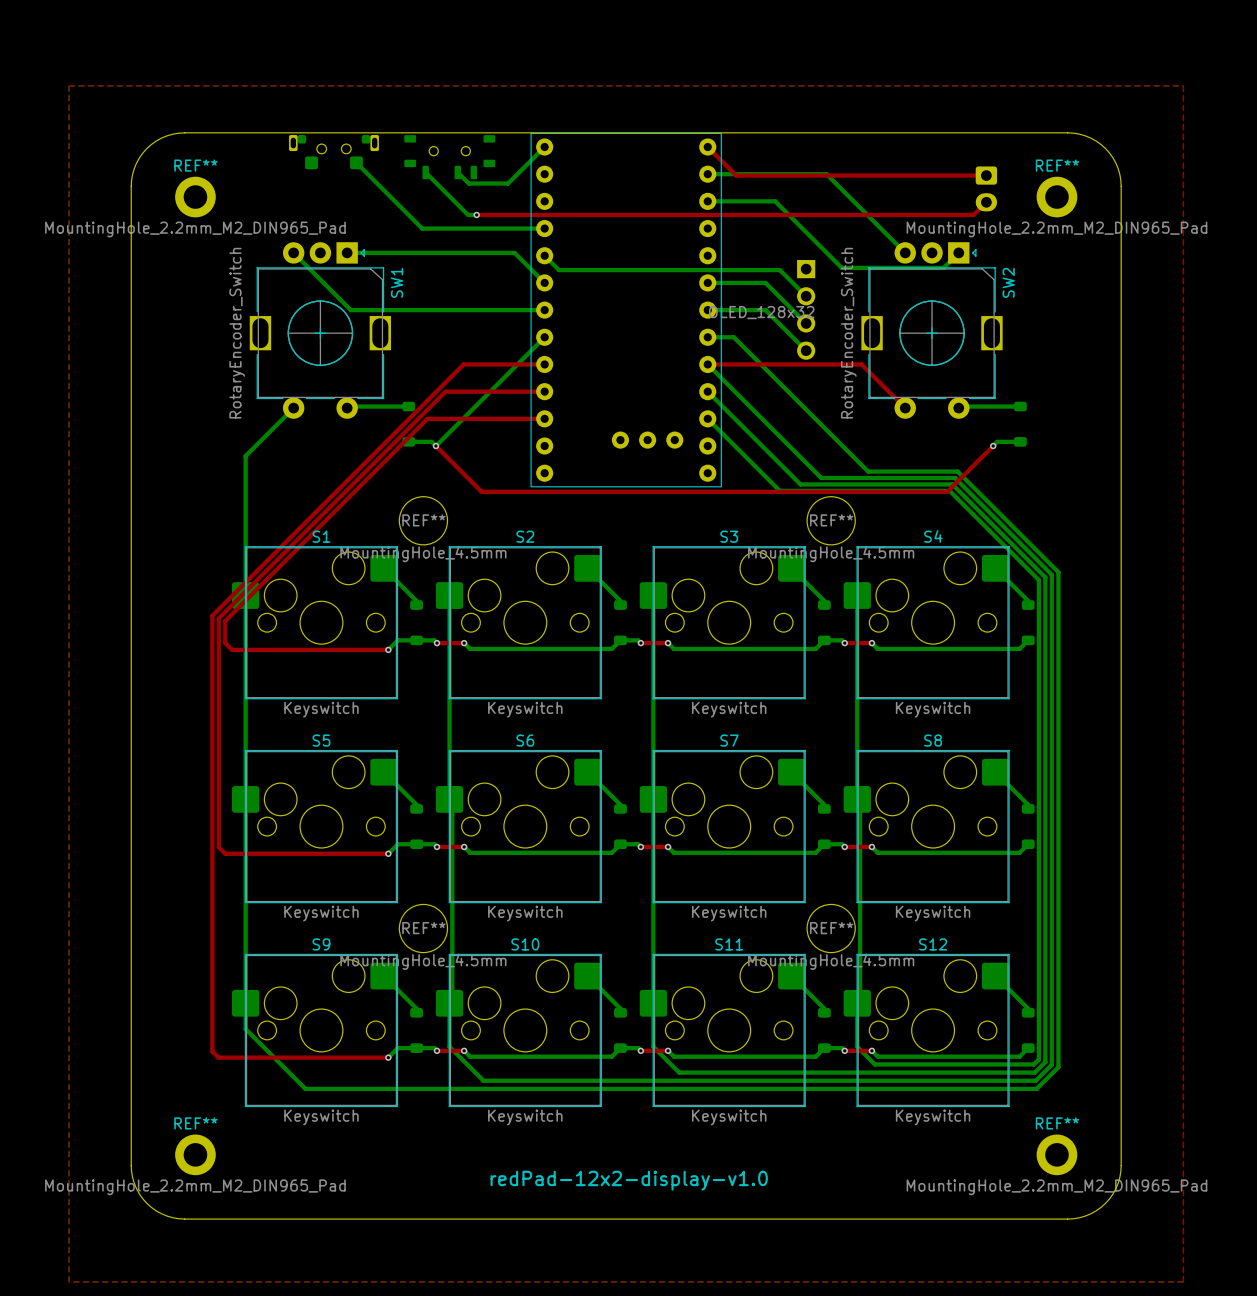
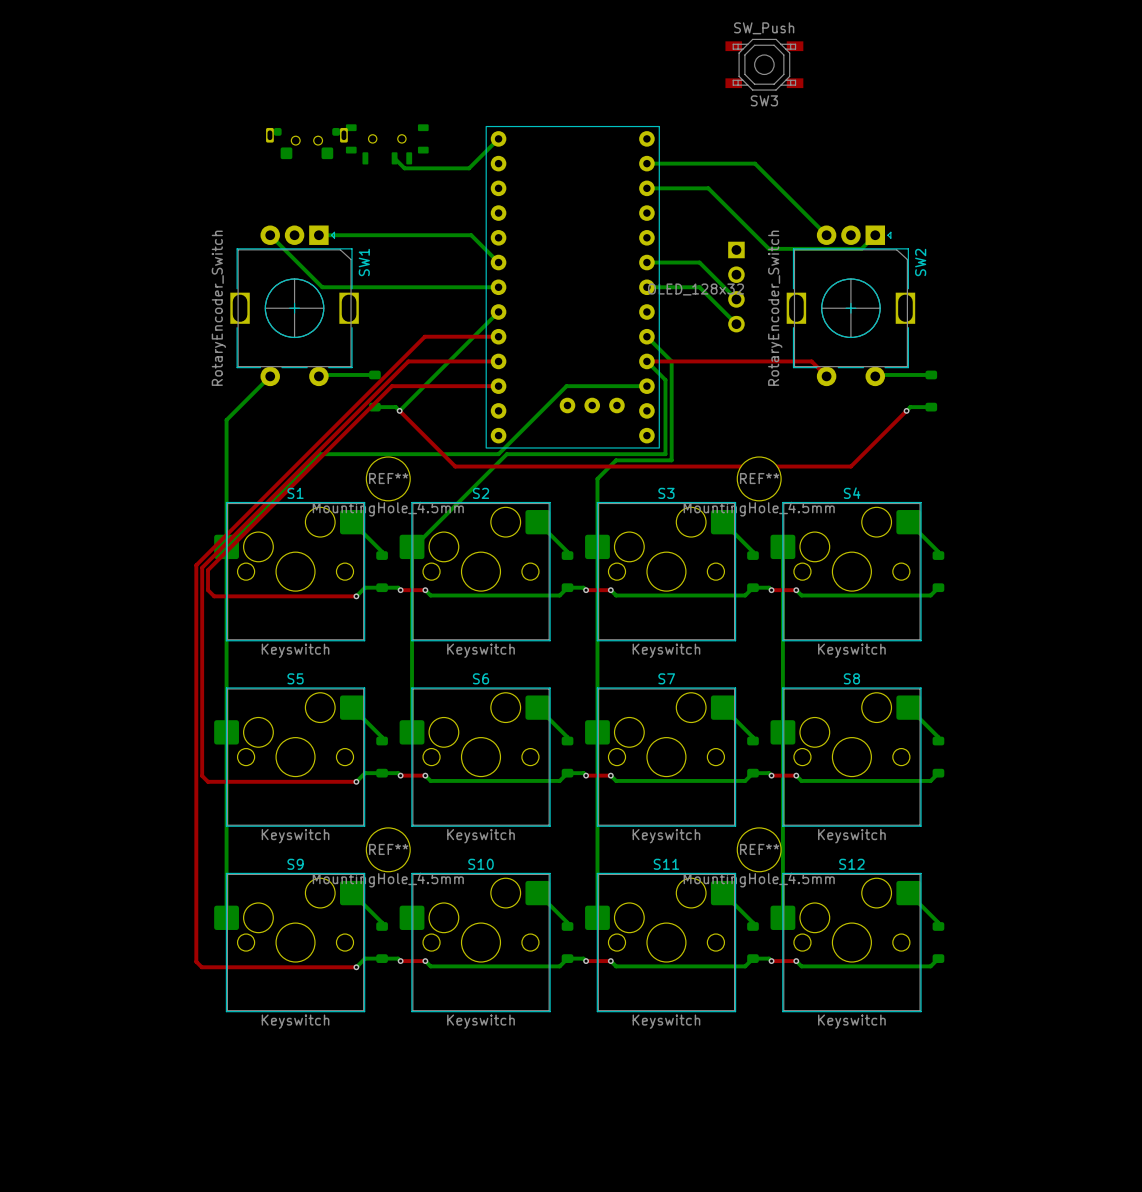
SW3: none -> SW_Push (764, 64)
top zone outline: (68, 85) (1183, 85) (1183, 1281) (68, 1281) (68, 85) -> none
board edge: (184, 132) (1067, 132) (1090, 138) (1109, 152) (1118, 168) (1121, 186) (1121, 1165) (1115, 1188) (1101, 1207) (1085, 1216) (1067, 1219) (184, 1219) (161, 1213) (142, 1198) (134, 1183) (131, 1165) (131, 186) (134, 168) (146, 148) (161, 138) (184, 132) -> none
top track: (707, 147) (736, 175) (986, 175) -> none
part position: (449, 157) -> (387, 144)
bottom track: (356, 162) (422, 228) (544, 228) -> none
bottom track: (425, 172) (468, 214) (476, 214) -> none
bottom track: (457, 172) (468, 183) (508, 183) (512, 179) -> (394, 158) (404, 168) (469, 168)
part: (986, 188) -> none
REF**: MountingHole_2.2mm_M2_DIN965_Pad (195, 197) -> none
REF**: MountingHole_2.2mm_M2_DIN965_Pad (1056, 197) -> none
top track: (986, 202) (973, 214) (476, 214) -> none
via: (476, 214) -> none
bottom track: (544, 255) (558, 270) (779, 270) (806, 296) -> none
bottom track: (707, 337) (733, 337) (868, 471) (957, 471) (1058, 572) (1058, 1067) (1036, 1088) (305, 1088) (245, 1029) (245, 1003) -> none
top track: (707, 364) (861, 364) (888, 391) -> (646, 361) (811, 361)
bottom track: (734, 391) (821, 478) (955, 478) (1051, 574) (1051, 1064) (1035, 1080) (483, 1080) (449, 1046) (449, 1003) (452, 1000) (452, 802) (449, 799) -> (671, 361) (671, 460) (616, 460) (597, 478) (597, 546)
bottom track: (728, 412) (800, 484) (952, 484) (1045, 577) (1045, 1062) (1034, 1072) (679, 1072) (653, 1046) (653, 1003) -> (665, 379) (665, 454) (506, 454) (414, 546)
bottom track: (707, 418) (779, 490) (949, 490) (1038, 580) (1038, 1059) (1033, 1064) (874, 1064) (857, 1046) (857, 1003) (860, 1000) (860, 802) (857, 799) -> (782, 917) (782, 732)
bottom track: none -> (646, 386) (566, 386) (498, 454) (319, 454) (226, 546)
top track: (481, 491) (947, 491) -> (441, 452) (455, 466) (850, 466) (864, 452)
REF**: MountingHole_2.2mm_M2_DIN965_Pad (195, 1154) -> none
REF**: MountingHole_2.2mm_M2_DIN965_Pad (1056, 1154) -> none
text: redPad-12x2-display-v1.0 (629, 1180) -> none

